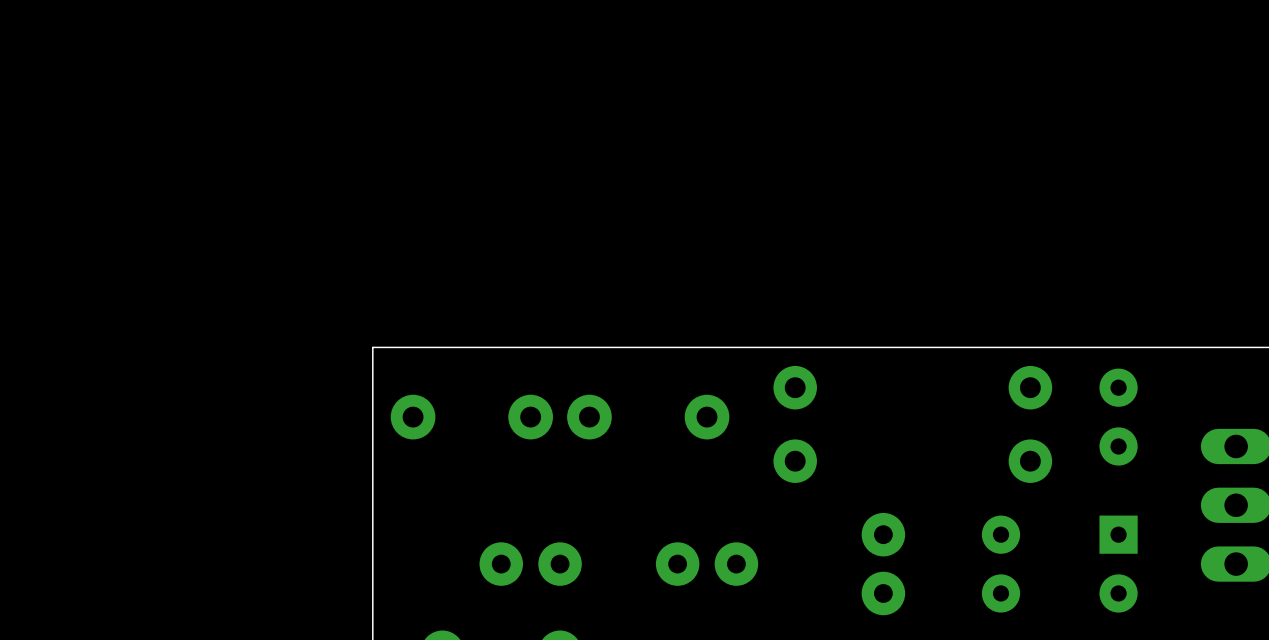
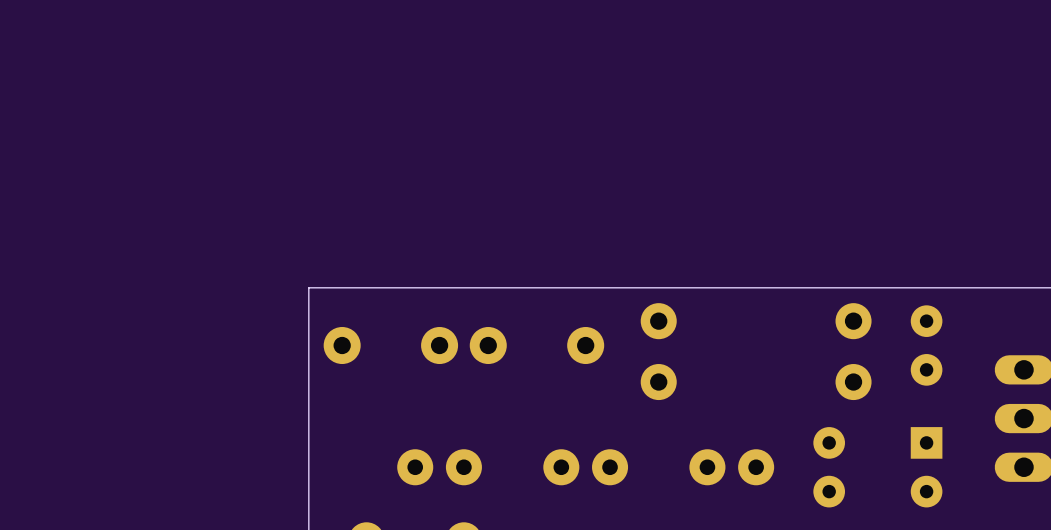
part rotation: 0° (883, 564) -> 90° clockwise (731, 467)

